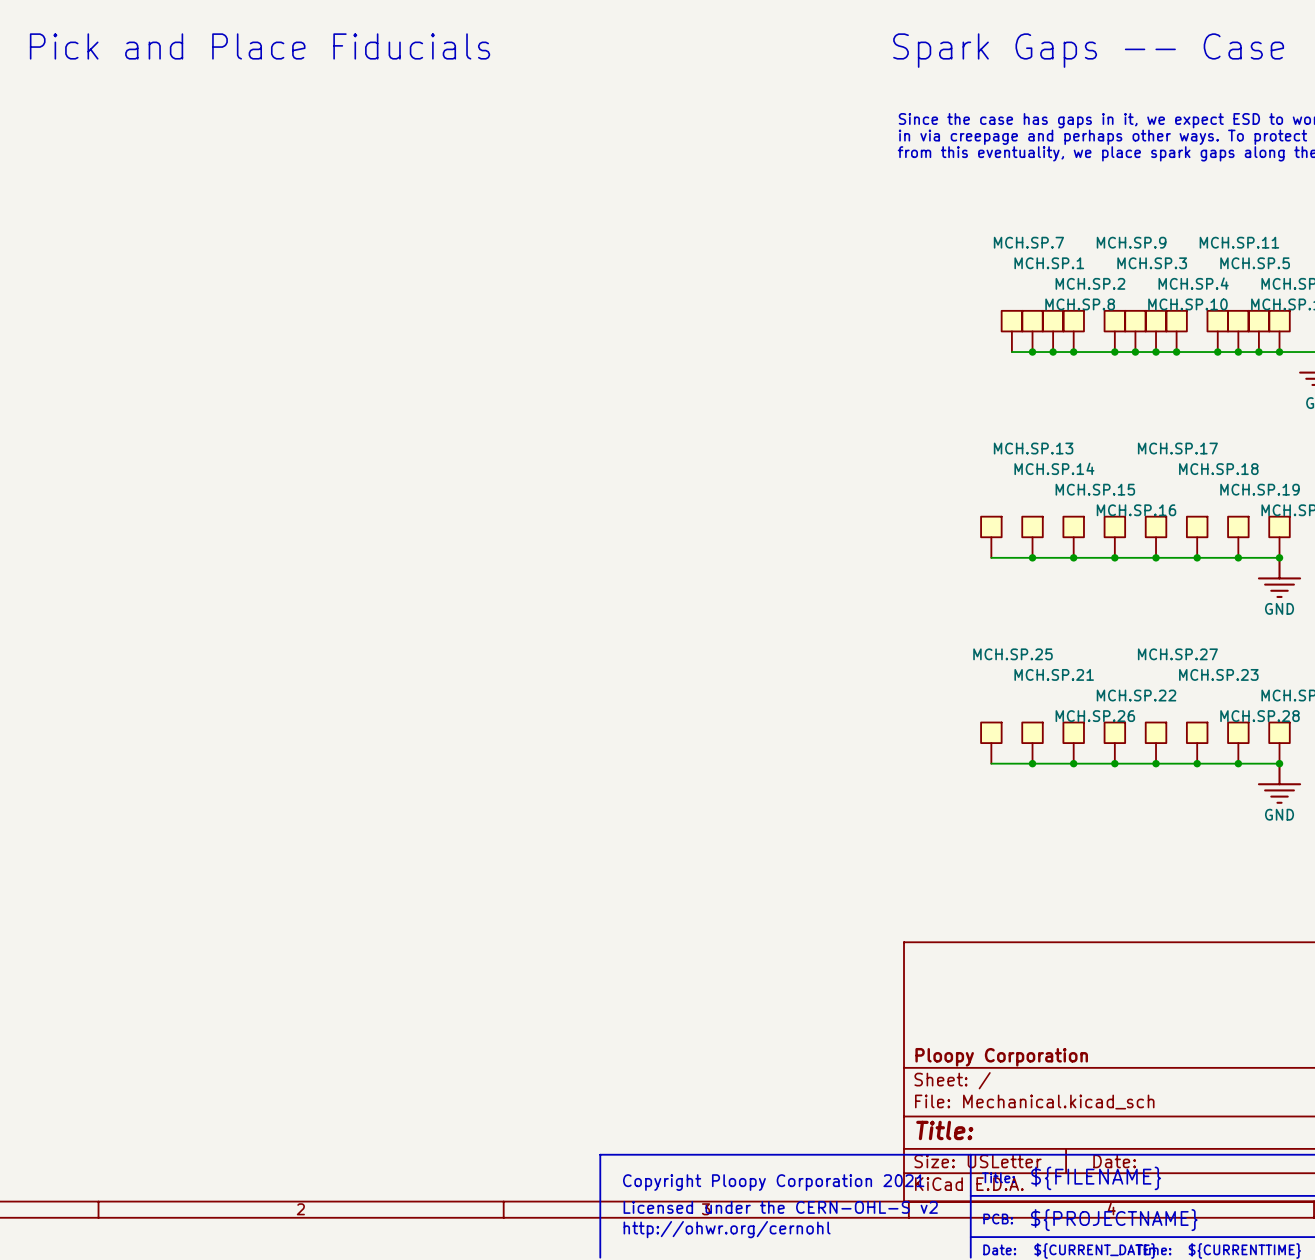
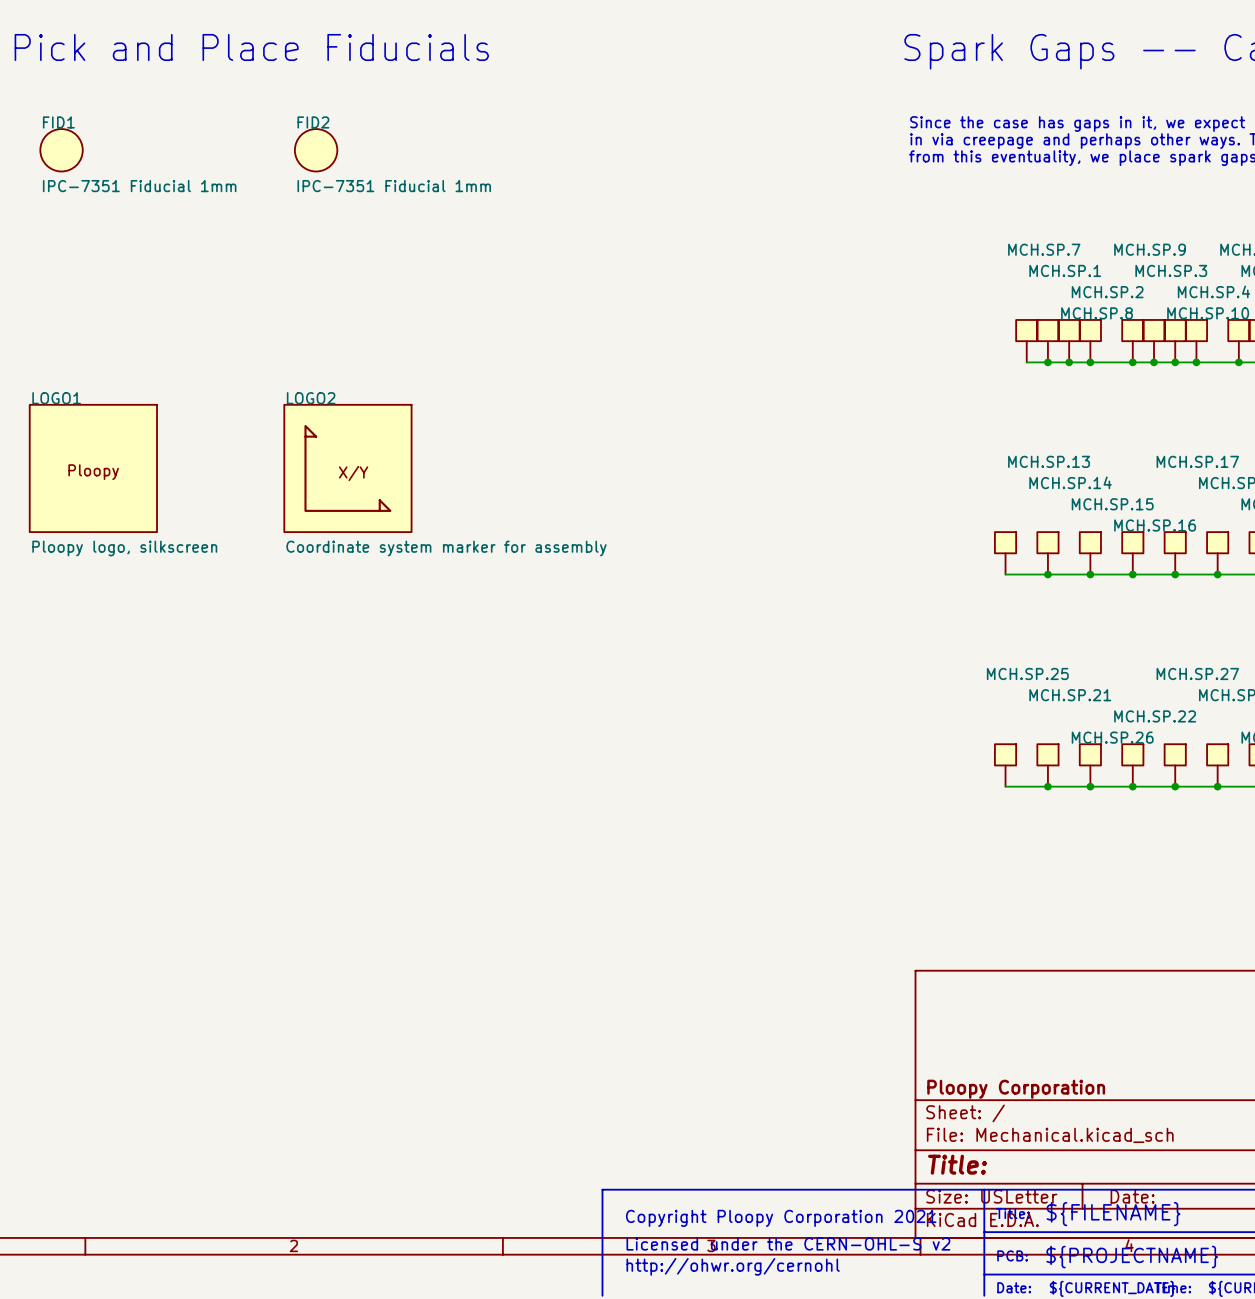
FID1: none -> IPC-7351 Fiducial 1mm (61, 150)
FID2: none -> IPC-7351 Fiducial 1mm (316, 150)
LOGO1: none -> Ploopy logo, silkscreen (93, 468)
LOGO2: none -> Coordinate system marker for assembly (347, 468)

